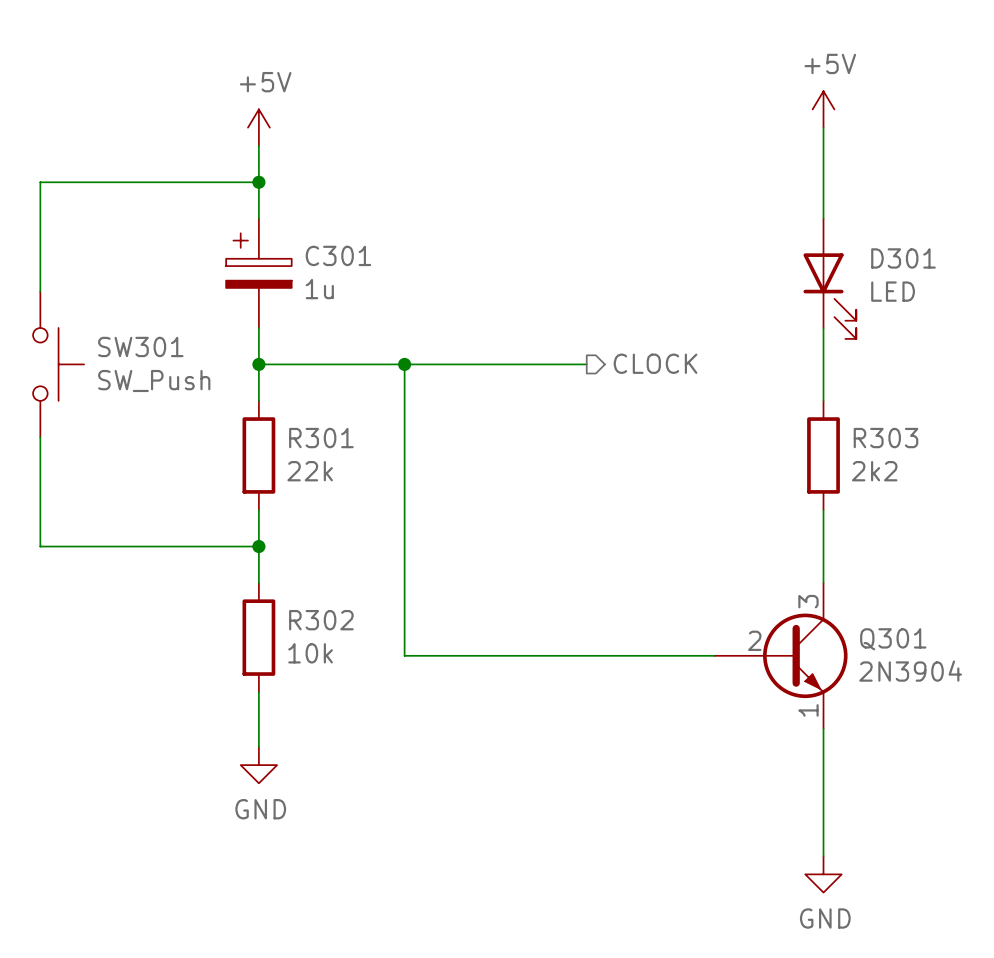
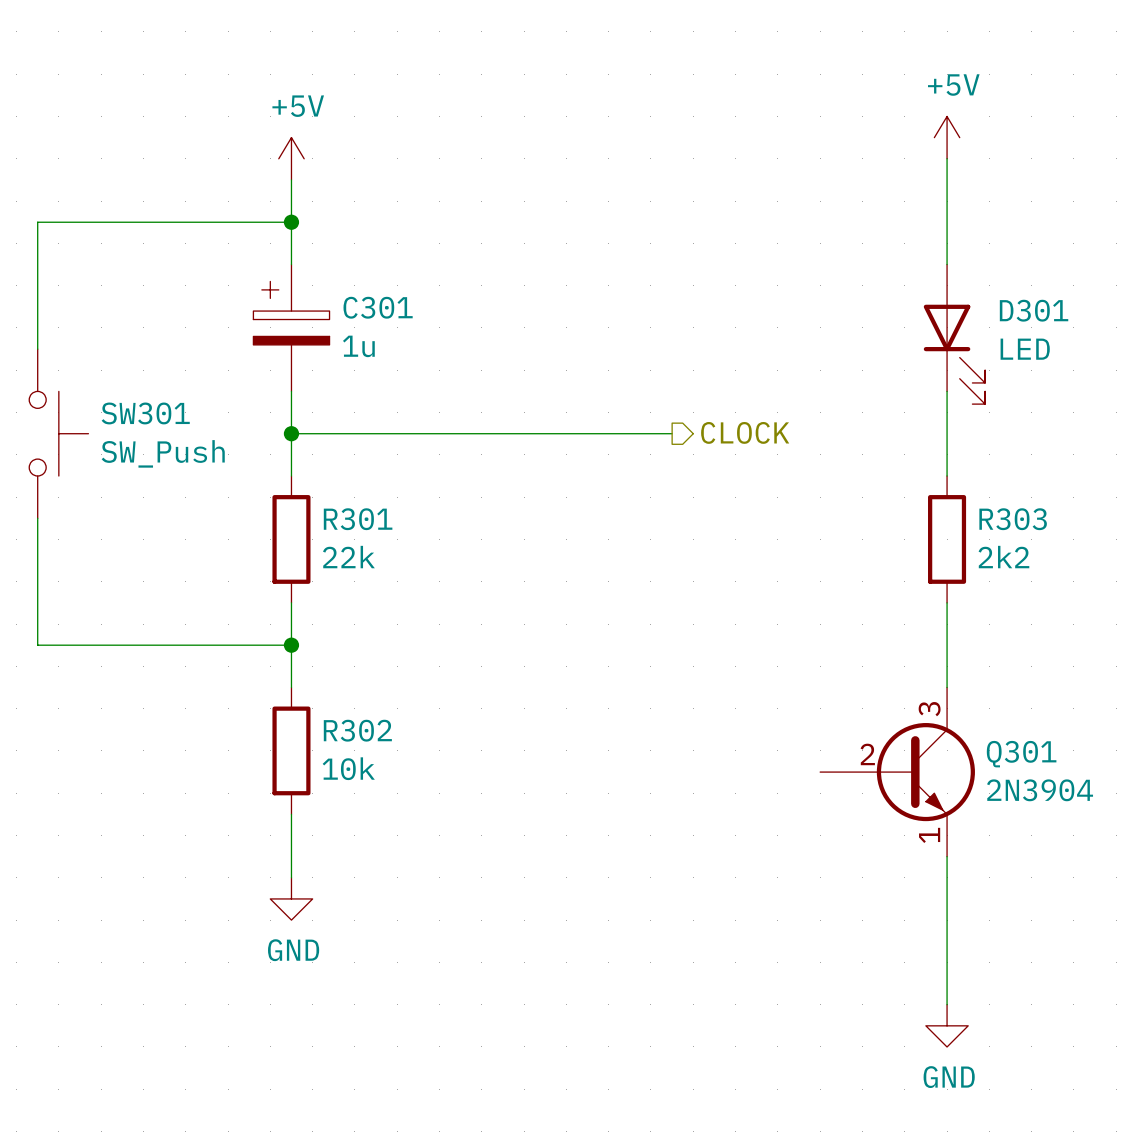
wire: (404, 364) (404, 655) (714, 655) -> none
junction: (404, 364) -> none

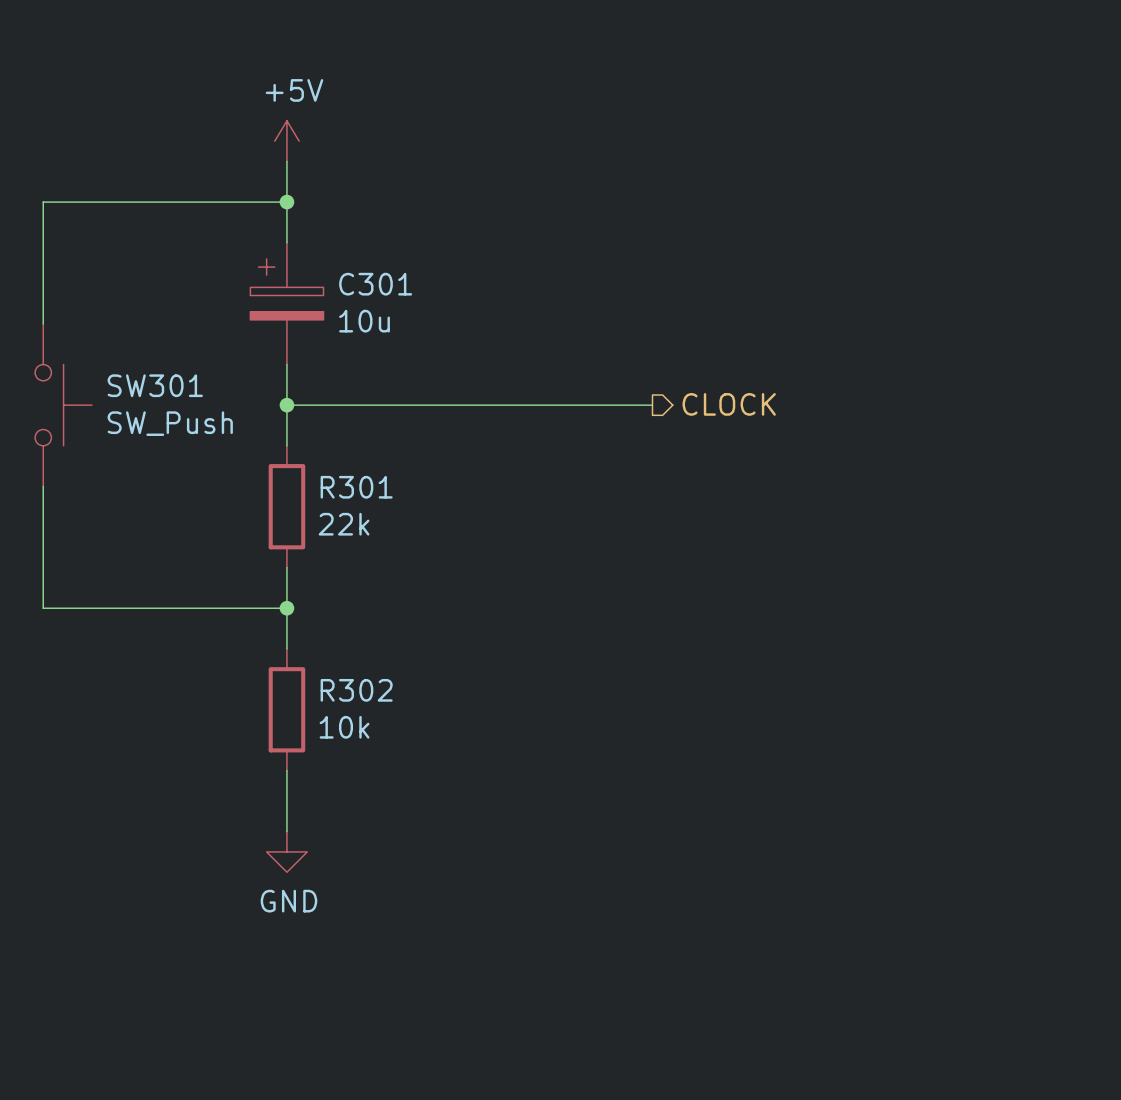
power symbol: +5V (947, 137) -> none
wire: (947, 158) (947, 264) -> none
D301: LED (954, 334) -> none
C301 value: 1u (358, 346) -> 10u (364, 321)
wire: (947, 391) (947, 476) -> none
R303: 2k2 (947, 539) -> none
wire: (947, 602) (947, 687) -> none
Q301: 2N3904 (897, 772) -> none
wire: (947, 856) (947, 1004) -> none
power symbol: GND (947, 1025) -> none

